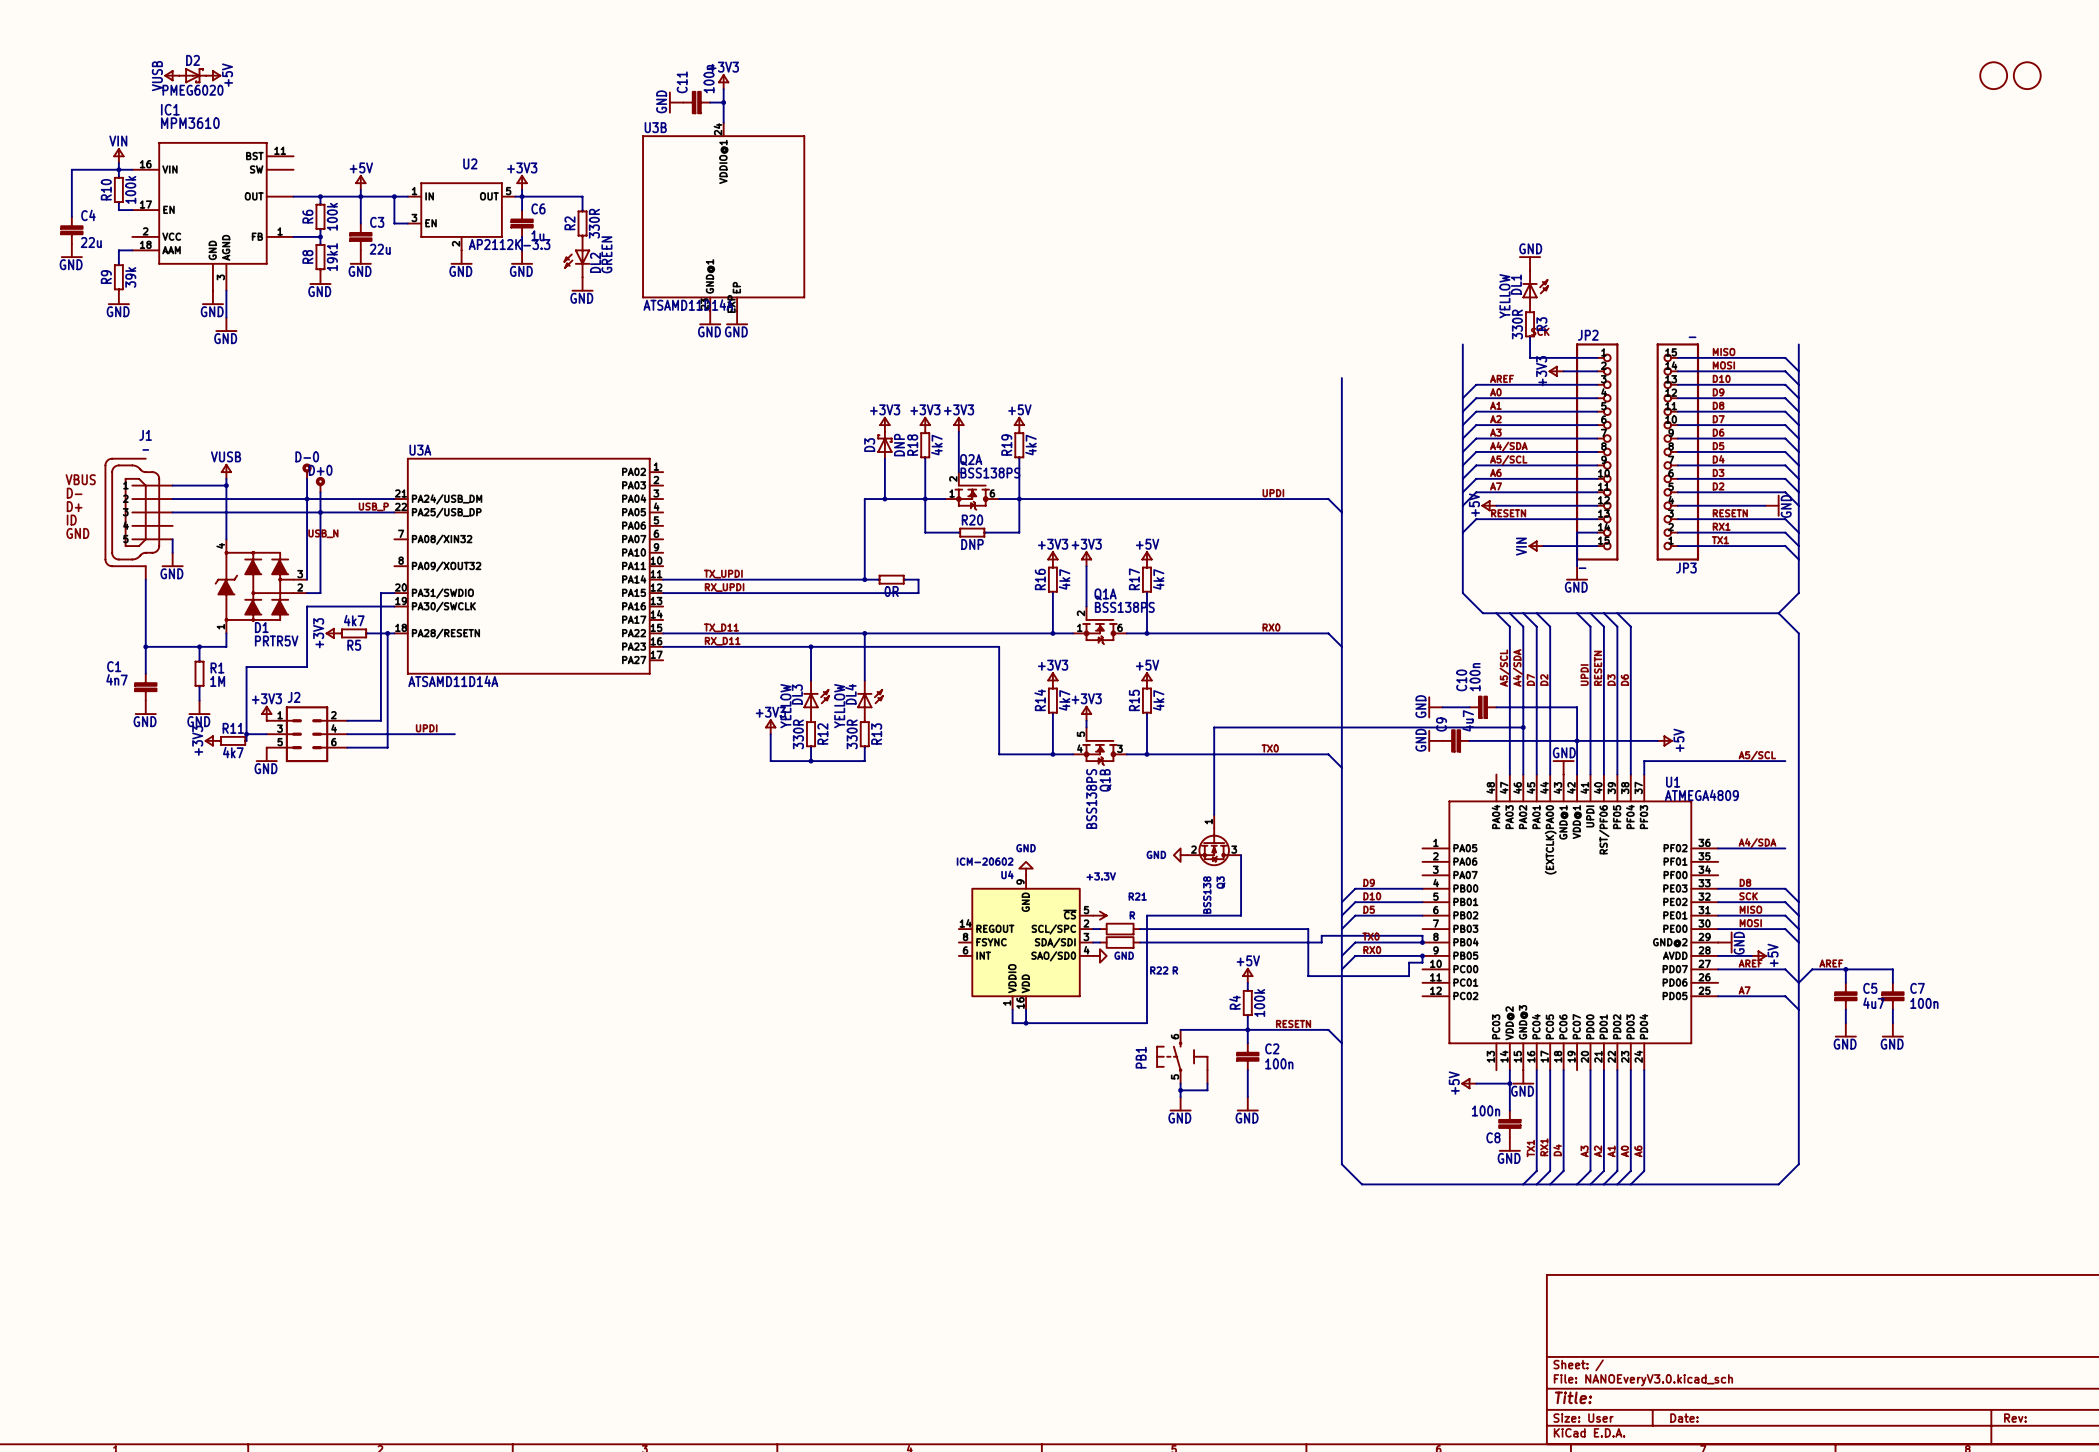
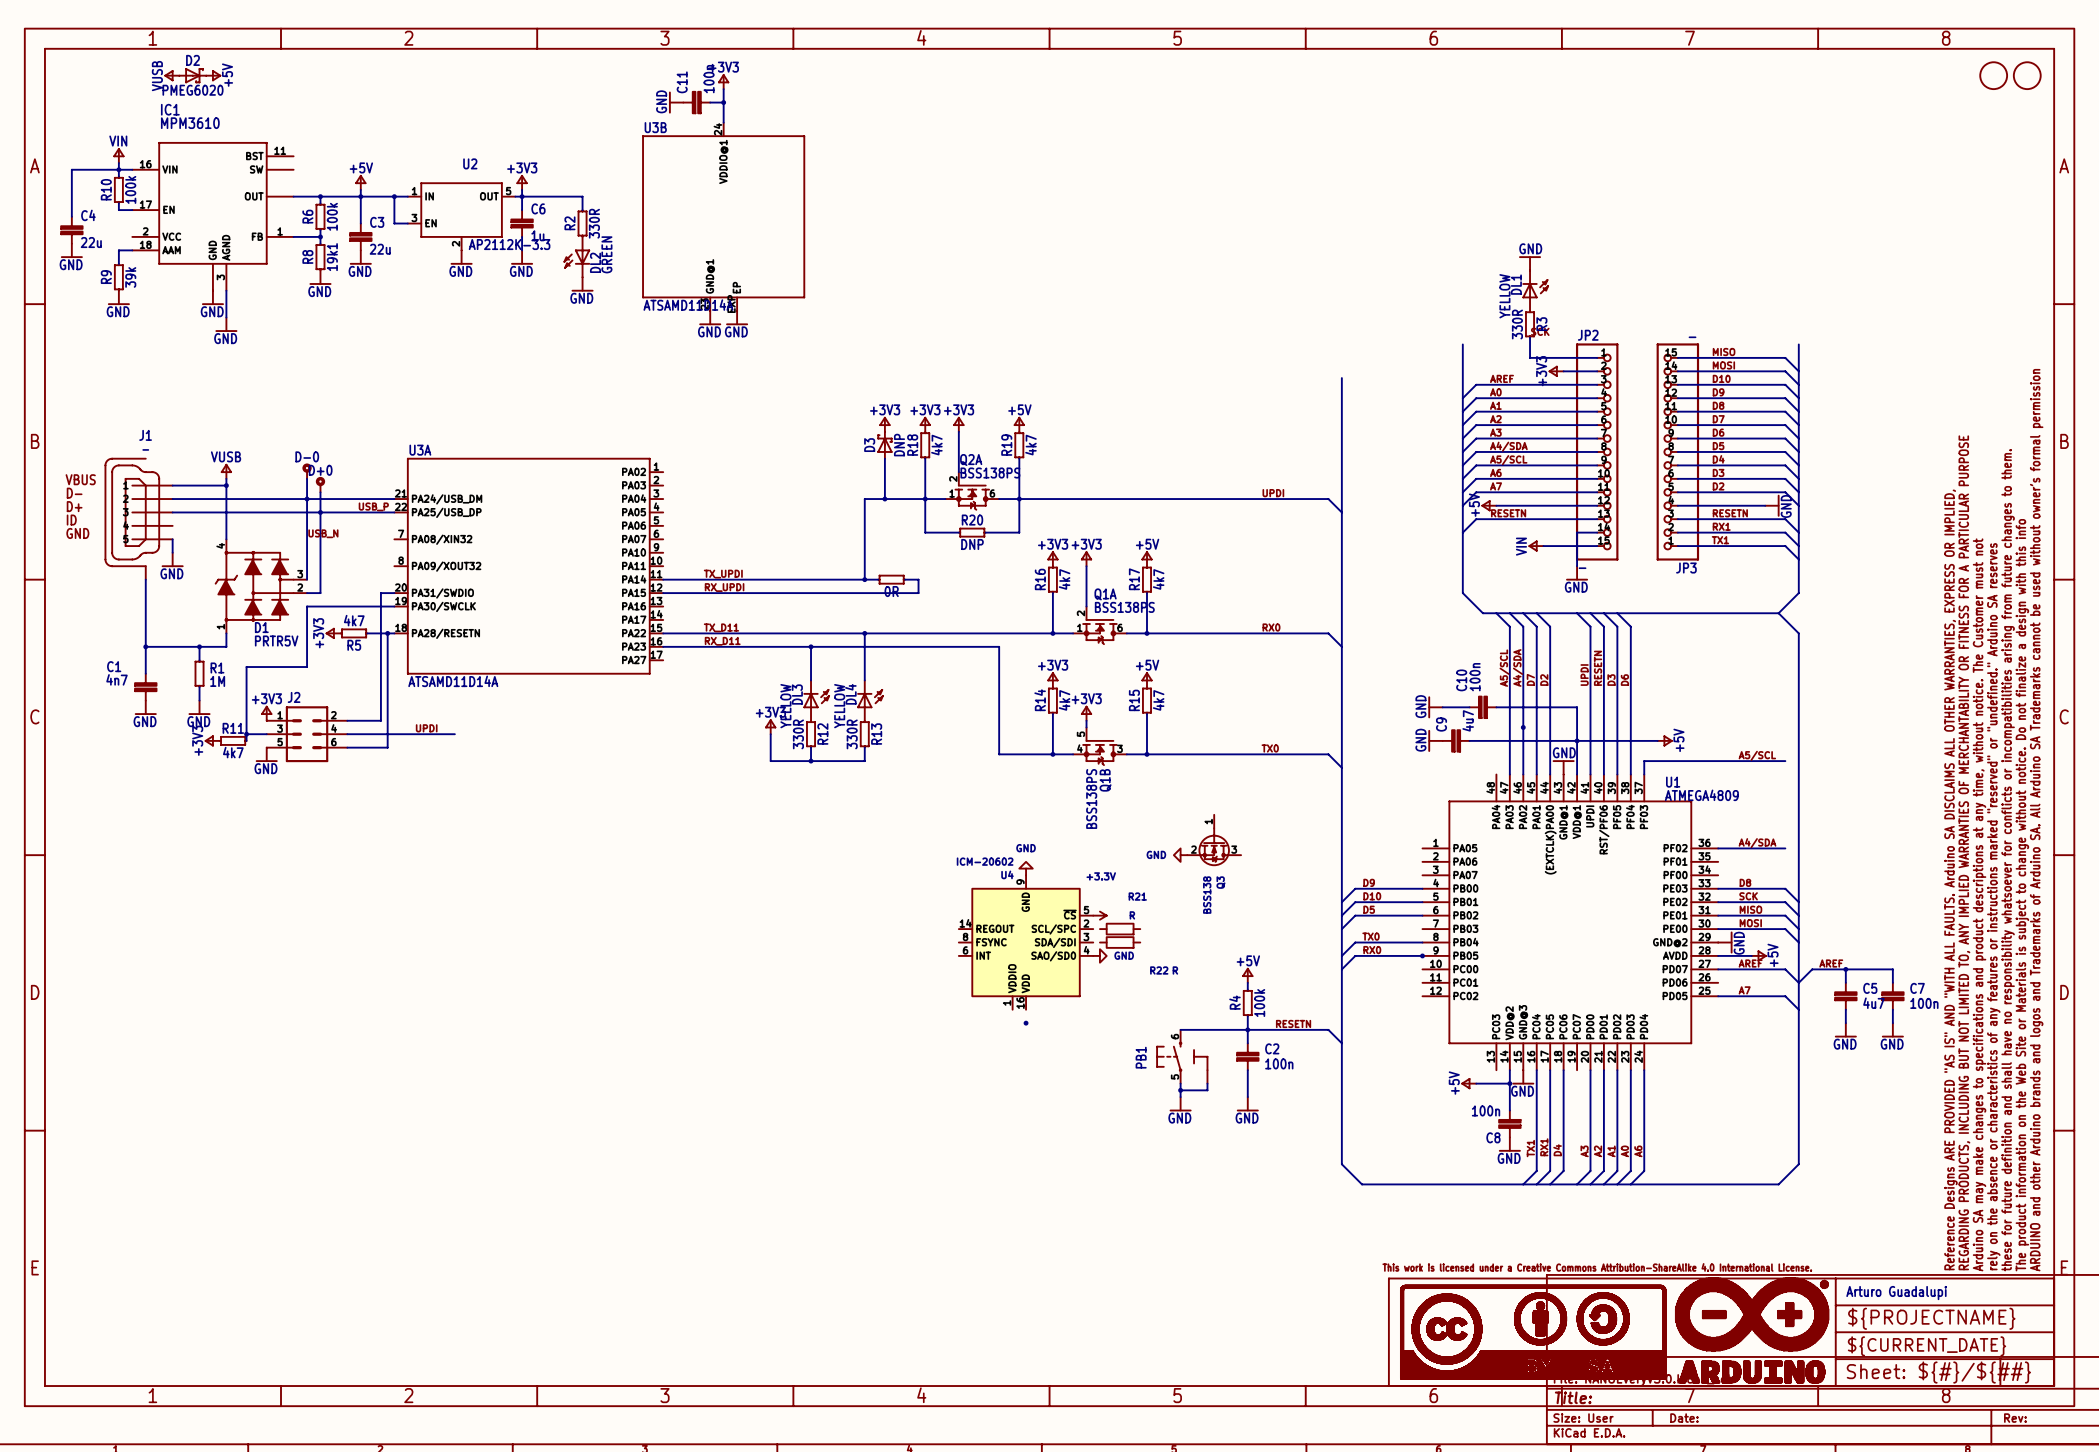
part: none -> (1049, 717)
wire: (1523, 727) (1214, 727) (1214, 814) -> none
wire: (1241, 855) (1241, 915) (1146, 915) (1146, 1023) (1012, 1023) (1012, 1009) -> none
wire: (1093, 929) (1099, 929) -> none
wire: (1140, 929) (1308, 929) (1308, 976) (1409, 976) (1409, 962) (1422, 962) (1422, 955) -> none
wire: (1093, 942) (1099, 942) -> none
wire: (1140, 942) (1321, 942) (1321, 935) (1422, 935) (1422, 942) -> none
junction: (1422, 942) -> none
wire: (1026, 1009) (1026, 1023) -> none
text: none -> Arturo Guadalupi (1896, 1293)

